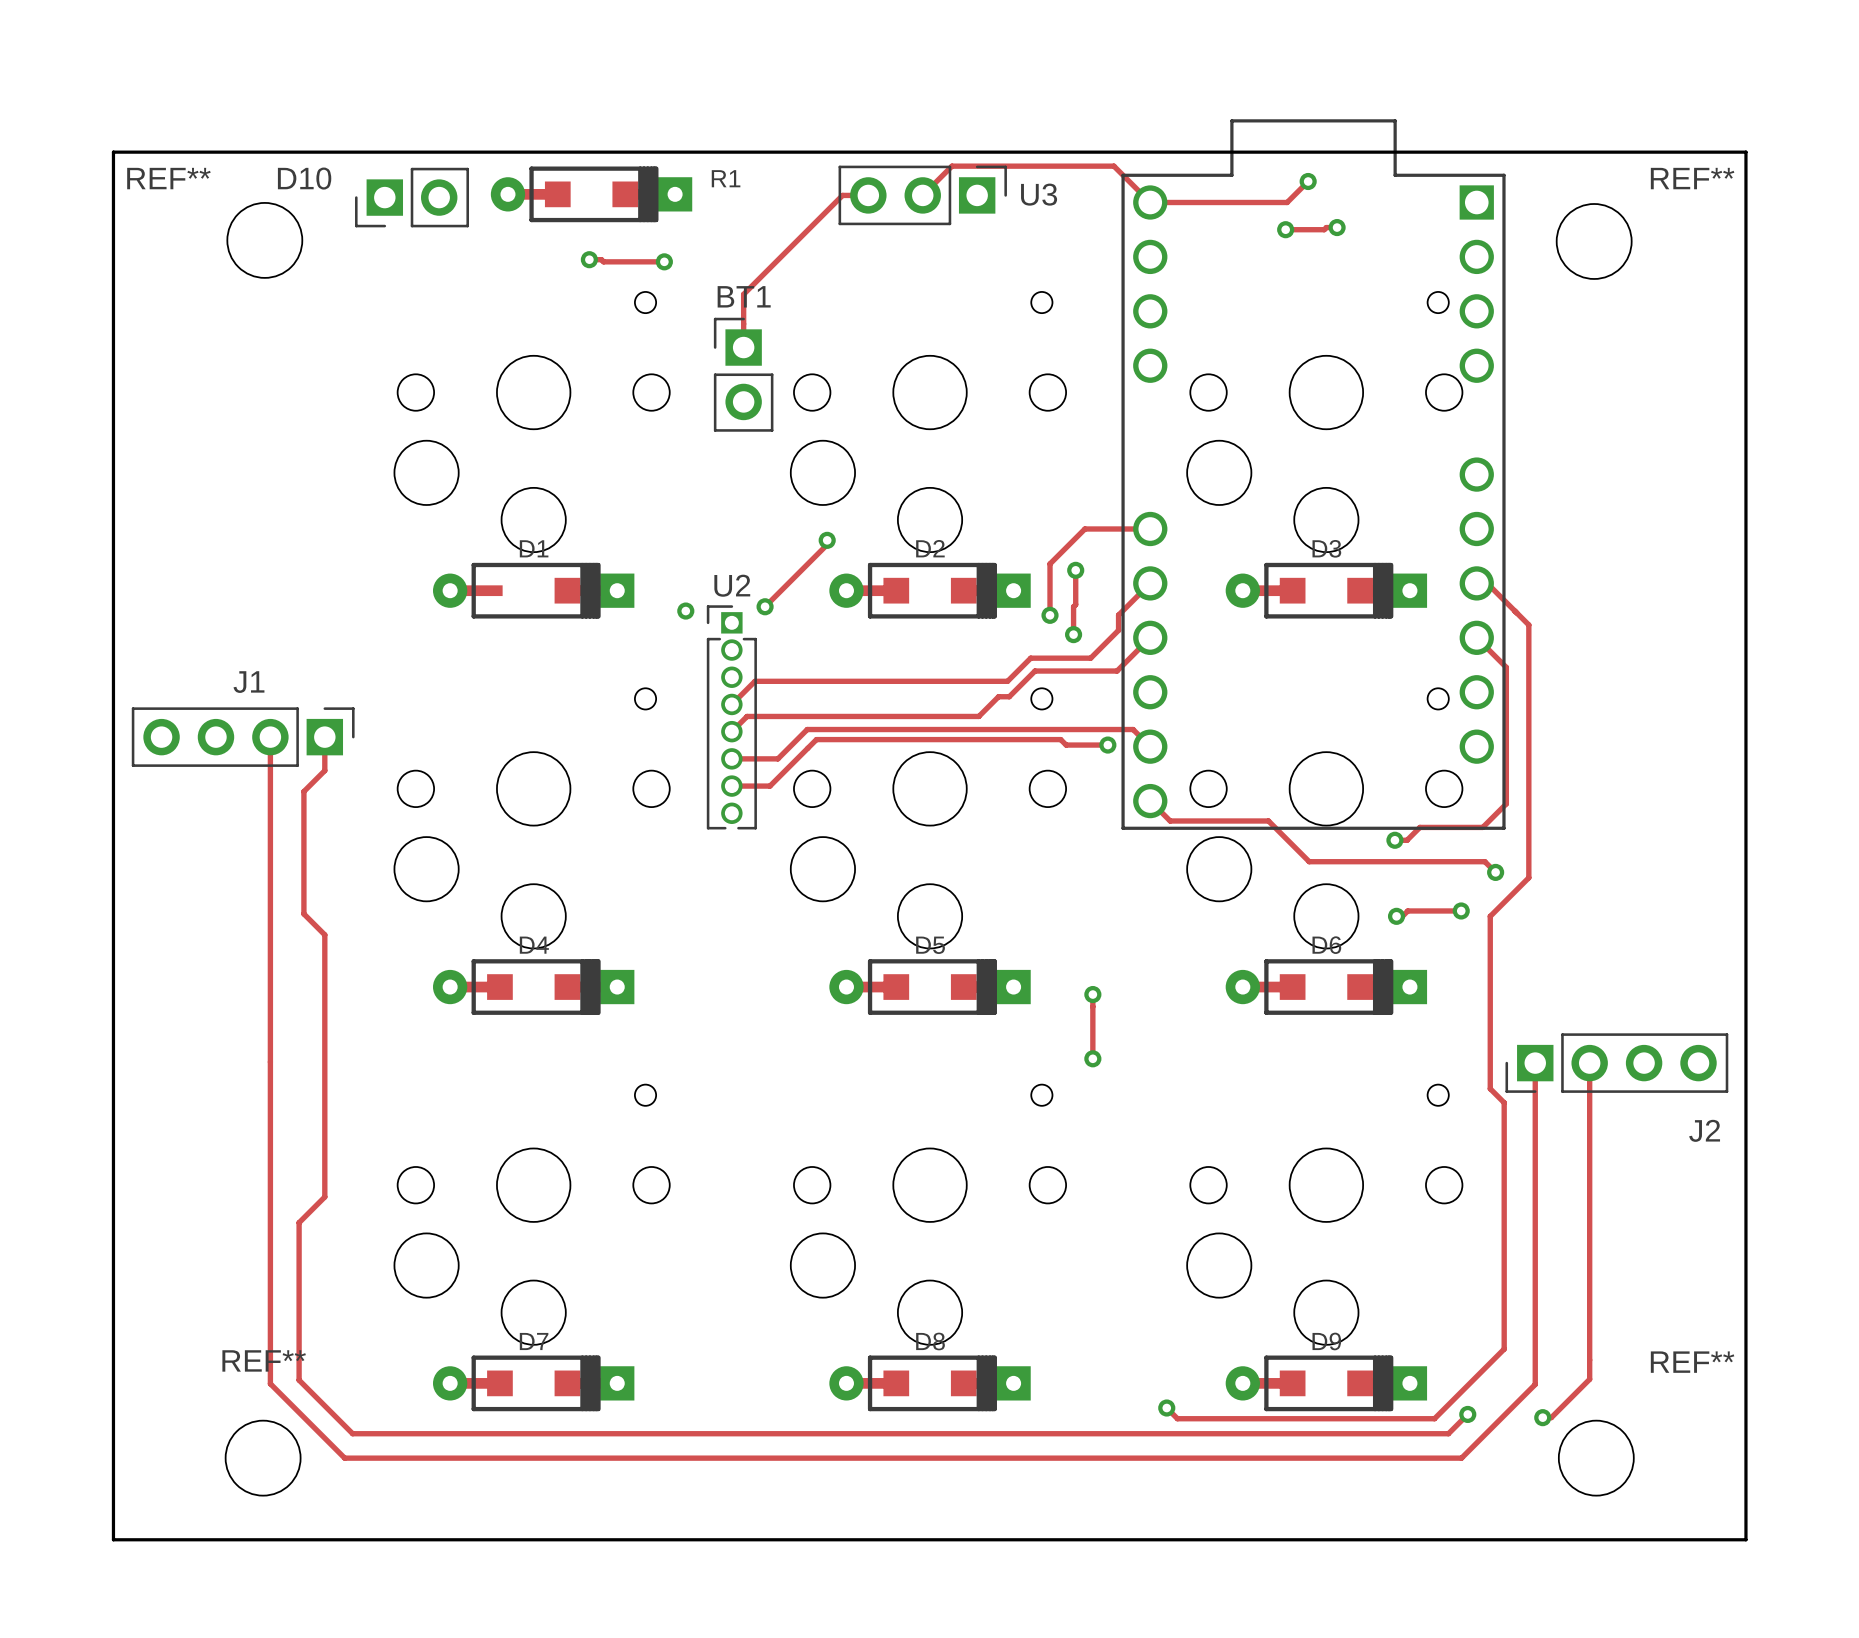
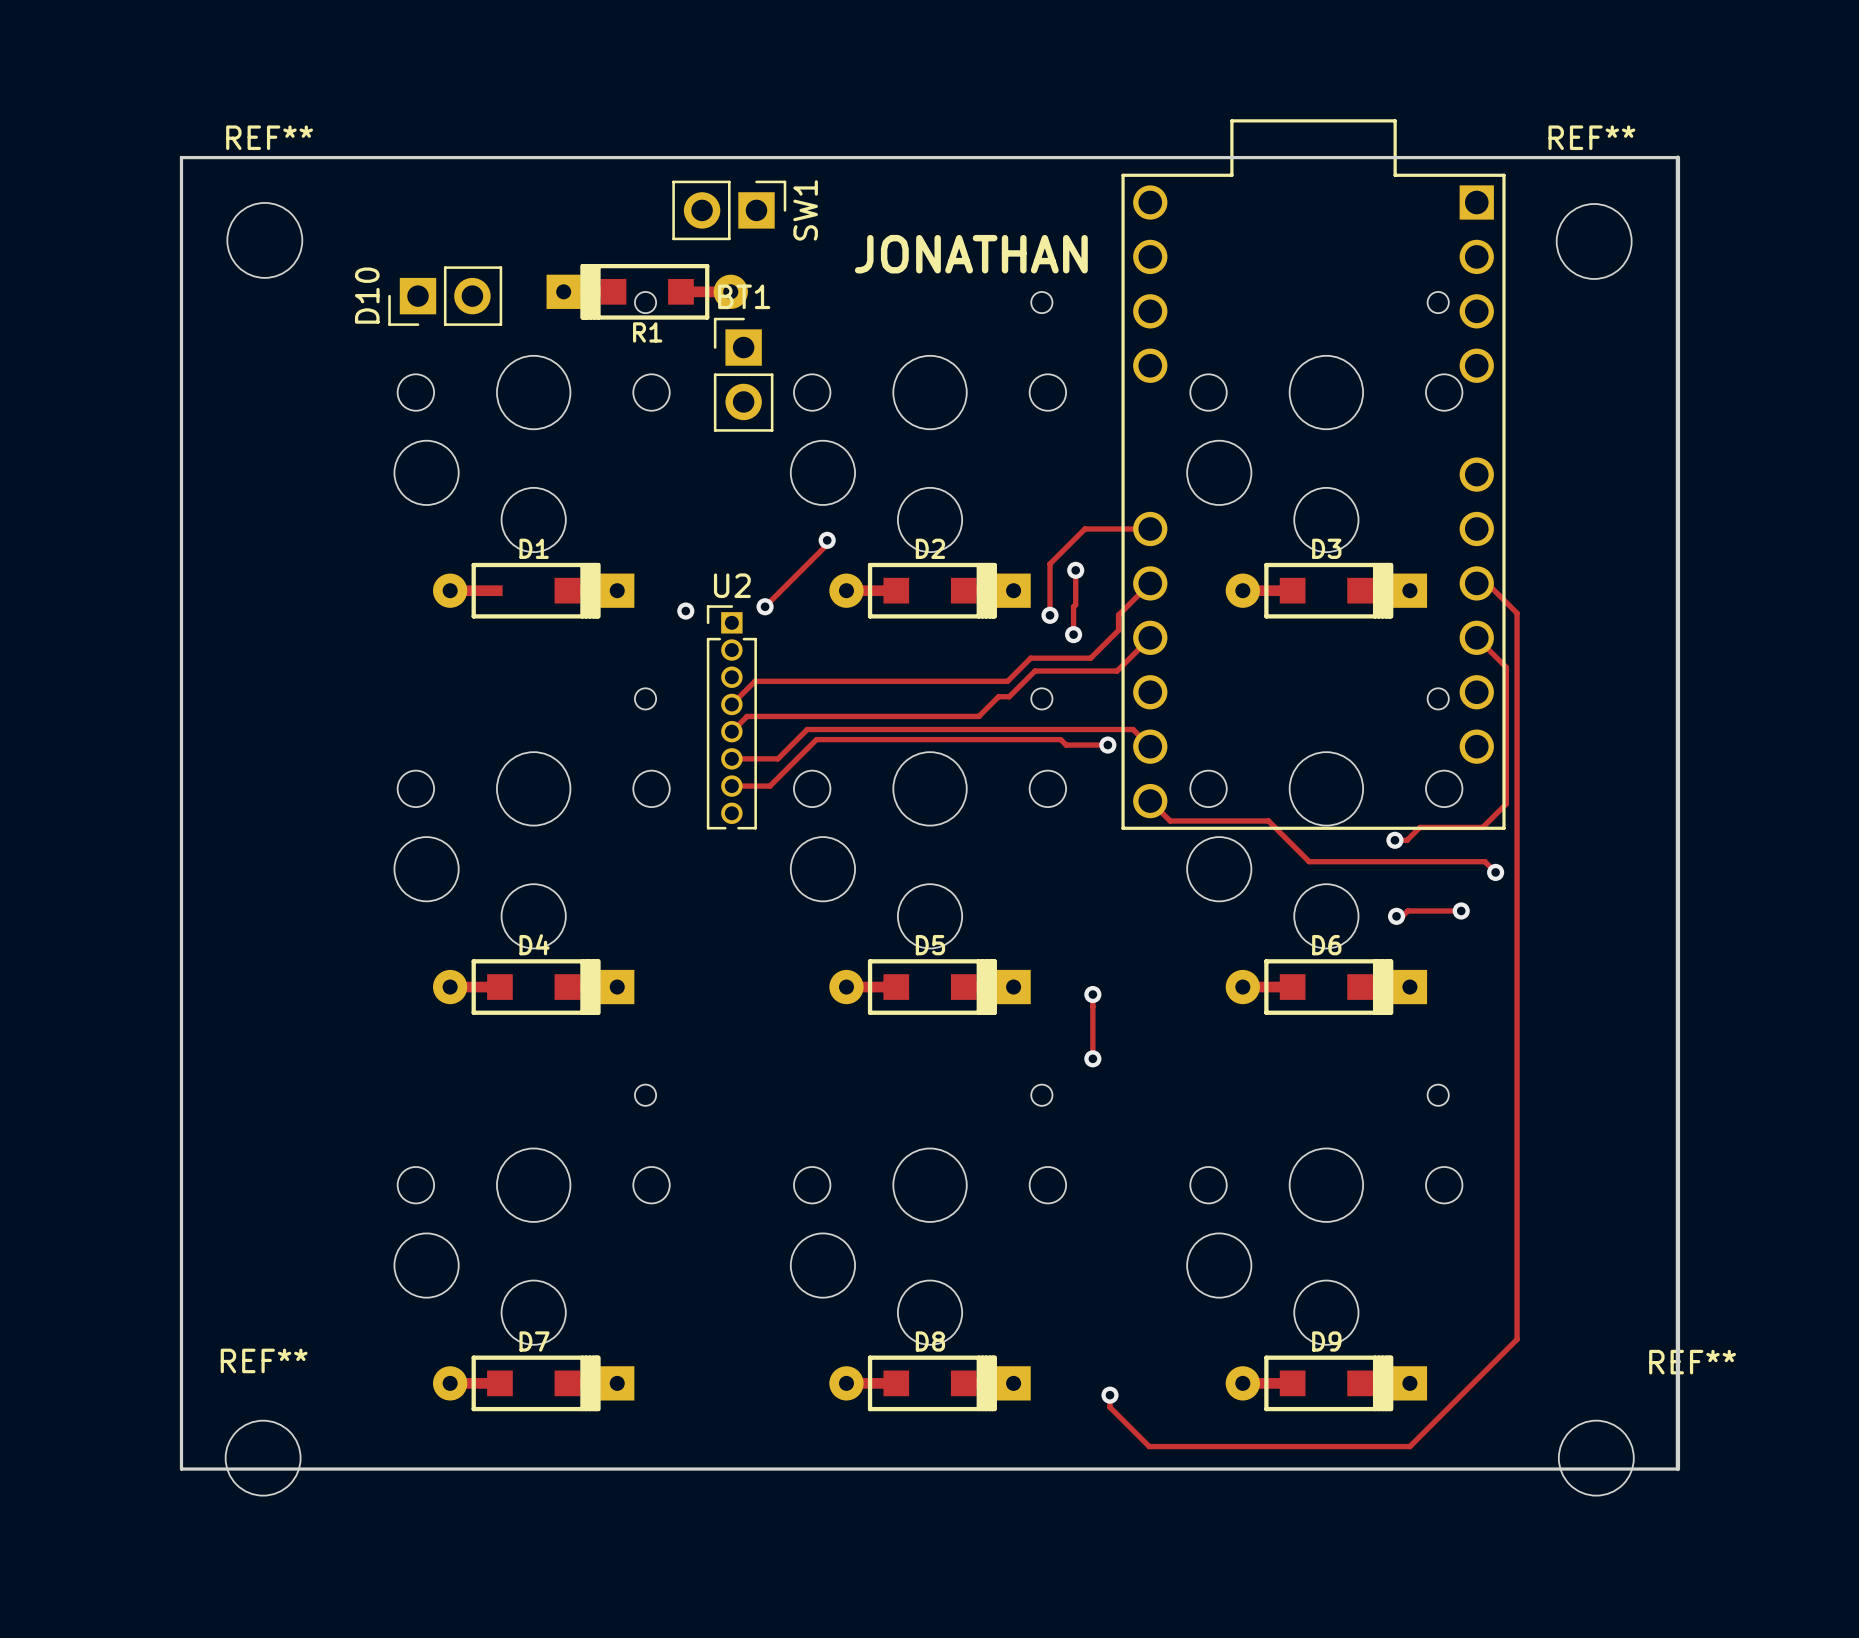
board edge: (113, 152) (1745, 152) (1745, 1539) (113, 1539) (113, 152) -> (181, 157) (181, 1469) (1677, 1469) (1677, 157) (181, 157)
REF** name position: REF** (168, 178) -> REF** (269, 137)
D10 name rotation: 0° (304, 178) -> 90° counterclockwise (367, 295)
R1 name position: R1 (726, 178) -> R1 (647, 332)
REF** name position: REF** (1692, 178) -> REF** (1591, 137)
track: (1308, 181) (1287, 202) (1150, 202) (1113, 166) (952, 166) (922, 195) -> none
via: (1308, 181) -> none
R1 rotation: 0° (591, 194) -> 180° (647, 291)
track: (868, 195) (842, 195) (743, 294) (743, 347) -> none
U3: (922, 195) -> none
D10 position: (412, 197) -> (445, 296)
SW1: none -> (729, 210)
track: (1337, 227) (1326, 227) (1324, 229) (1285, 229) -> none
via: (1337, 227) -> none
via: (1285, 229) -> none
text: none -> JONATHAN (971, 254)
track: (589, 259) (601, 259) (603, 261) (664, 261) -> none
via: (589, 259) -> none
via: (664, 261) -> none
track: (1517, 613) (1528, 624) (1528, 877) (1490, 916) (1490, 1088) (1504, 1102) (1504, 1349) (1434, 1418) (1177, 1418) (1166, 1408) -> (1517, 613) (1517, 1339) (1409, 1446) (1149, 1446) (1109, 1407) (1109, 1395)
J1: (243, 737) -> none
track: (270, 737) (270, 1383) (344, 1458) (1461, 1458) (1535, 1384) (1535, 1063) -> none
track: (324, 737) (324, 770) (303, 791) (303, 913) (324, 934) (324, 1196) (299, 1222) (299, 1380) (352, 1433) (1448, 1433) (1467, 1414) -> none
track: (1589, 1063) (1589, 1379) (1551, 1417) (1542, 1417) -> none
J2: (1616, 1063) -> none
via position: (1166, 1408) -> (1109, 1395)
via: (1467, 1414) -> none
via: (1542, 1417) -> none

